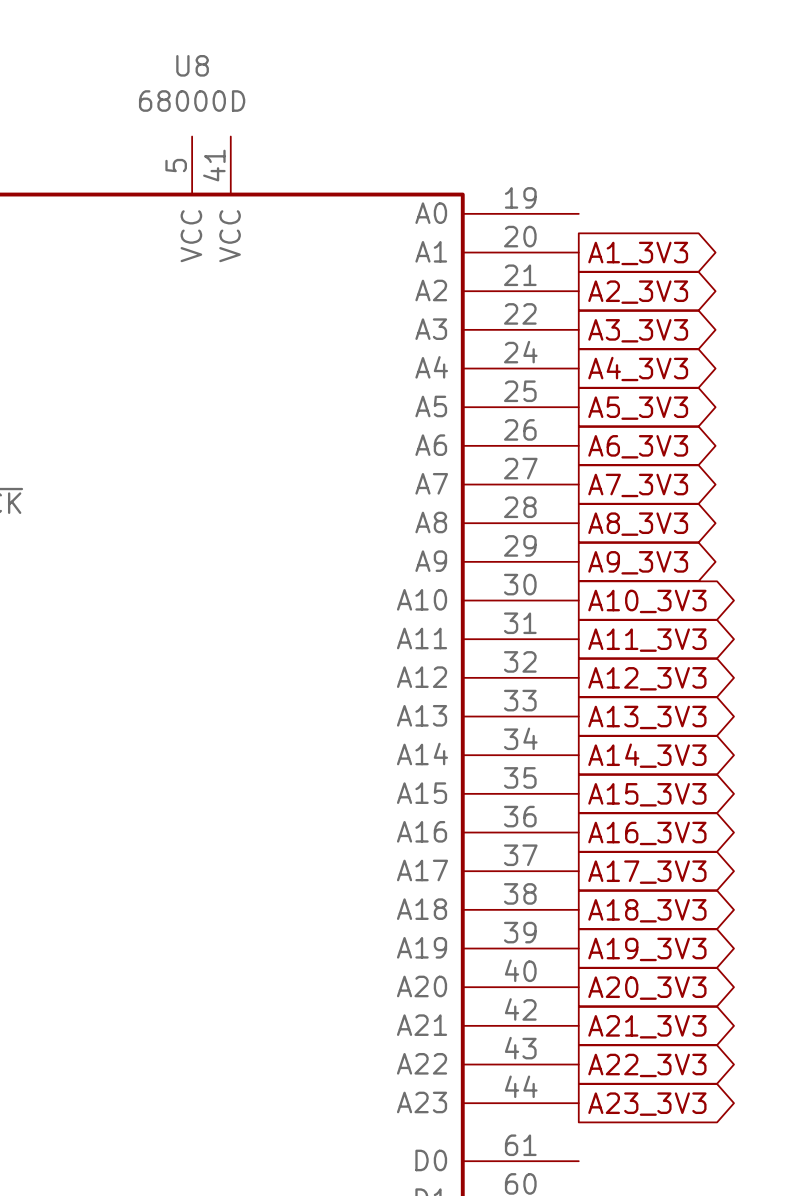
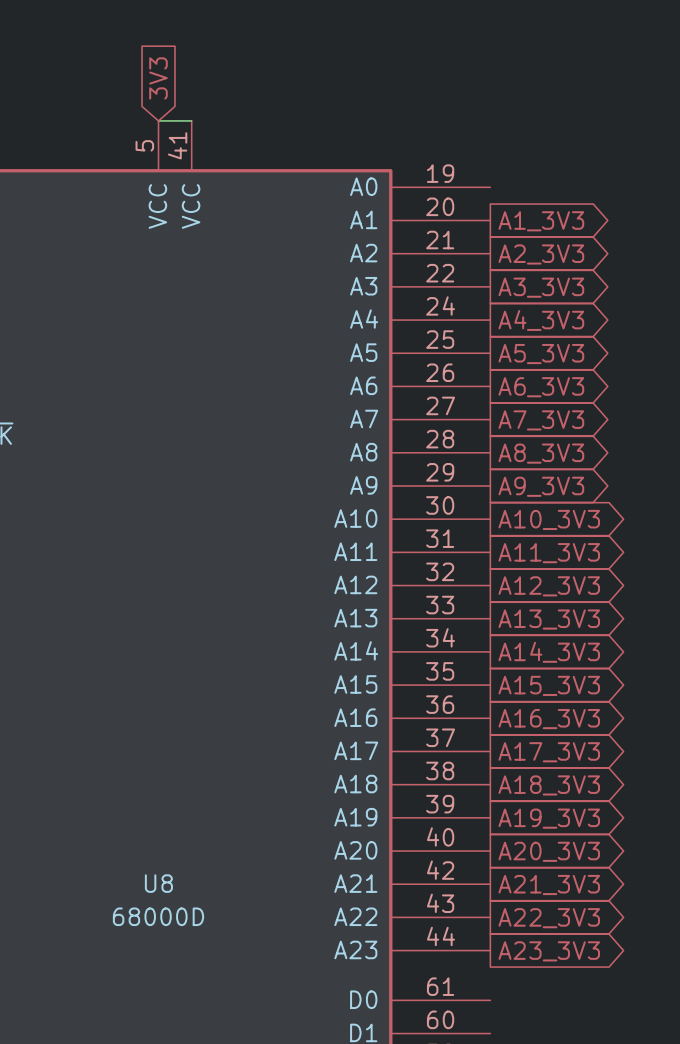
U8 name position: U8 (192, 65) -> U8 (158, 883)
global label: none -> 3V3 (158, 78)
U8 value position: 68000D (192, 101) -> 68000D (158, 916)
wire: none -> (158, 120) (191, 120)

